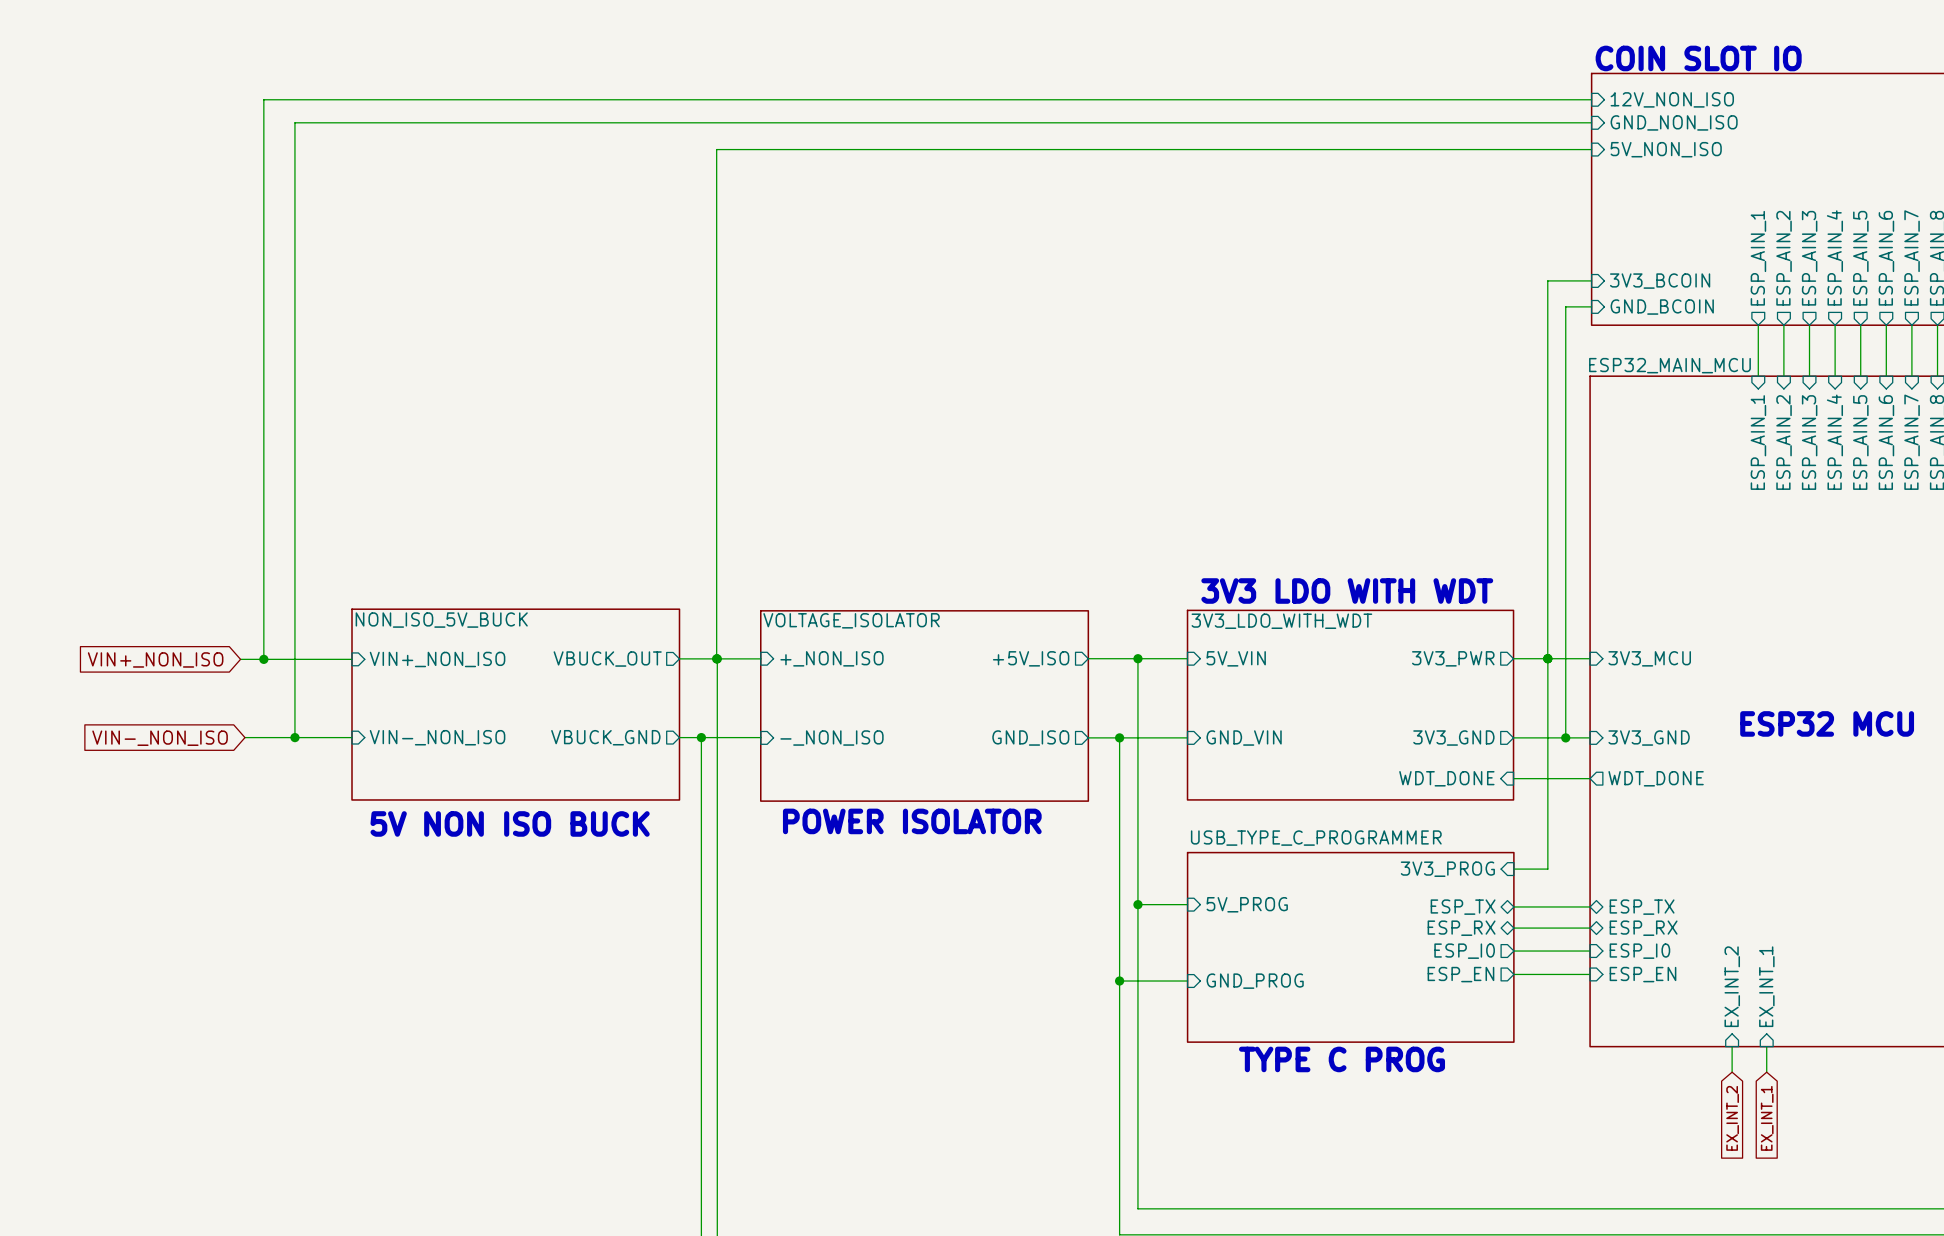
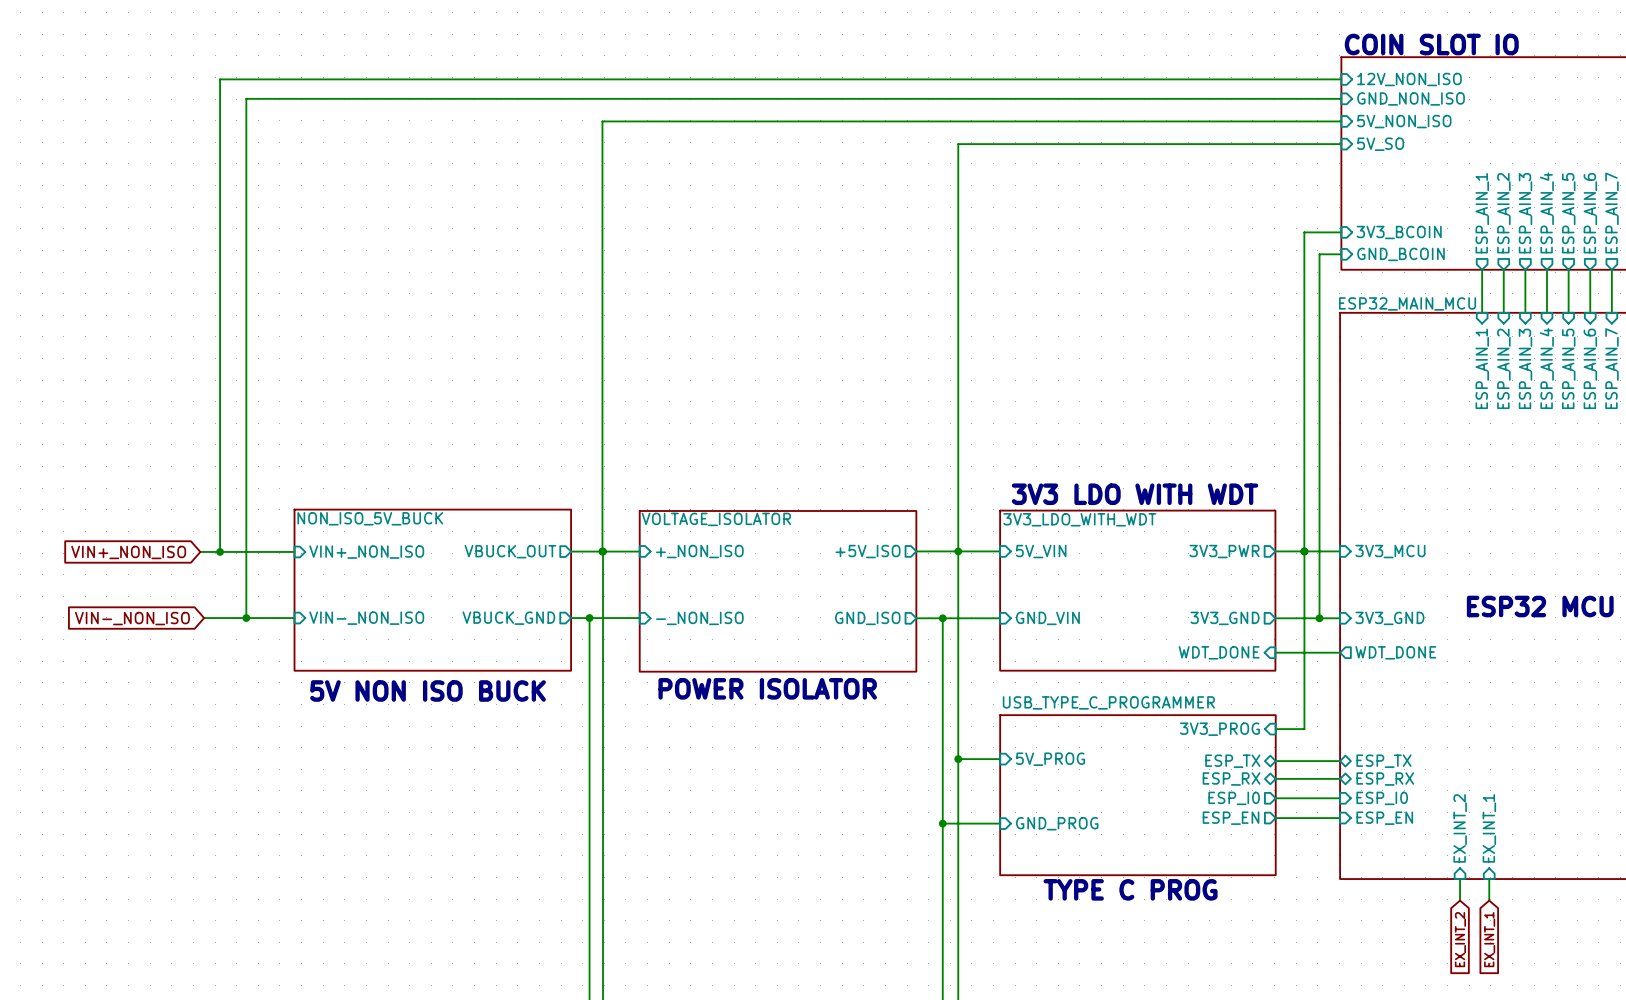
wire: none -> (1341, 144) (958, 144) (958, 551)
sheet pin: none -> 5V_SO (1380, 144)

